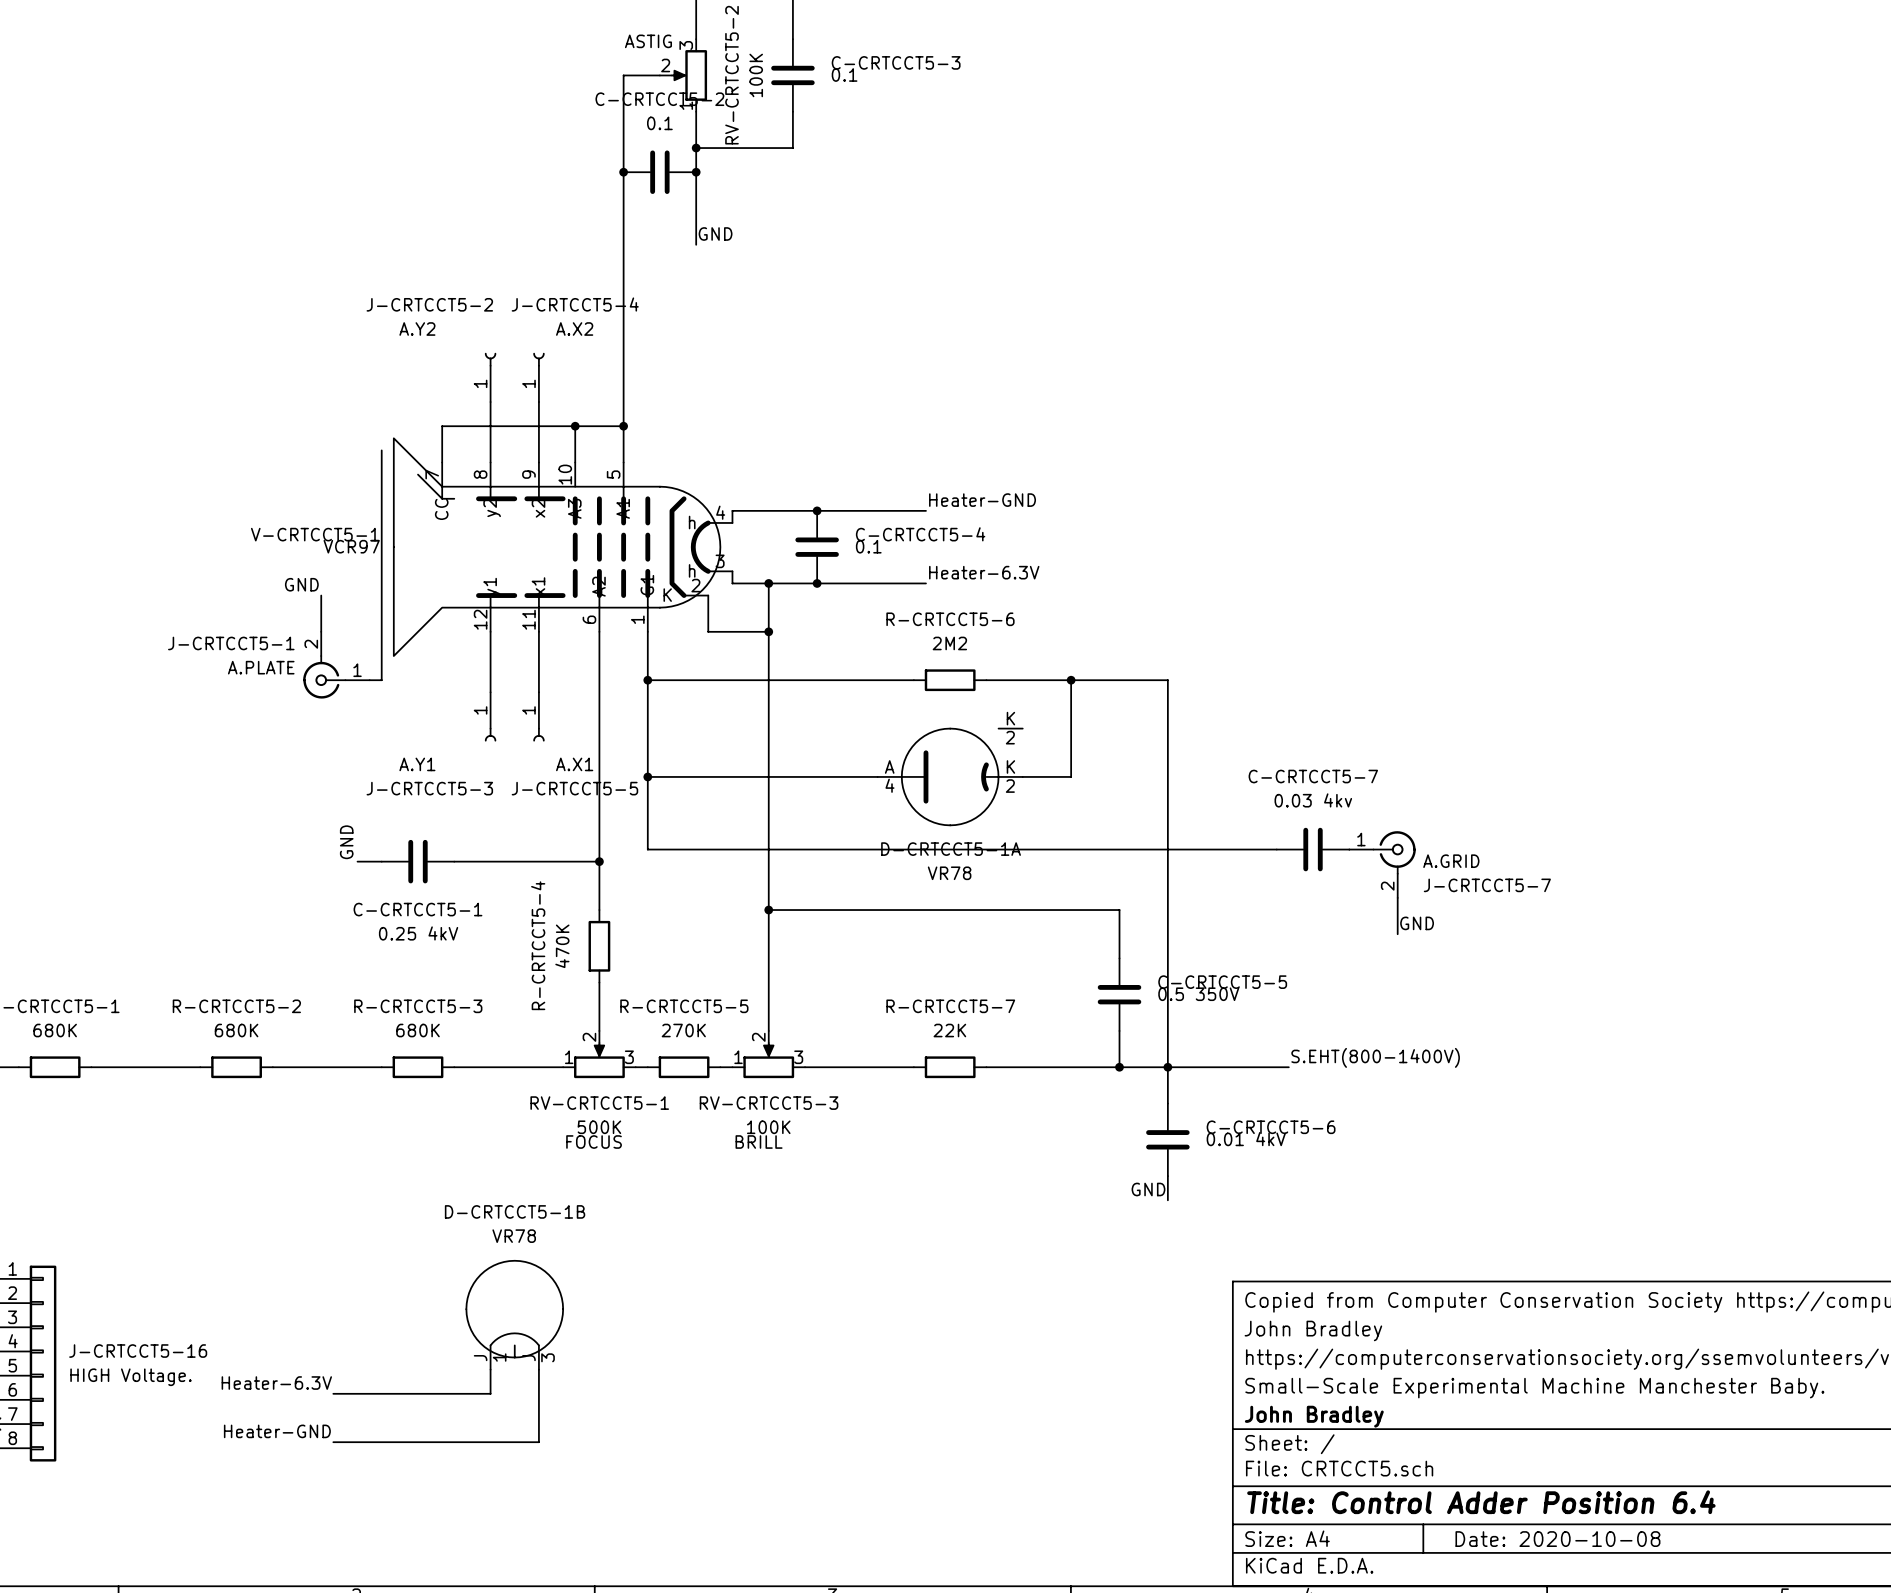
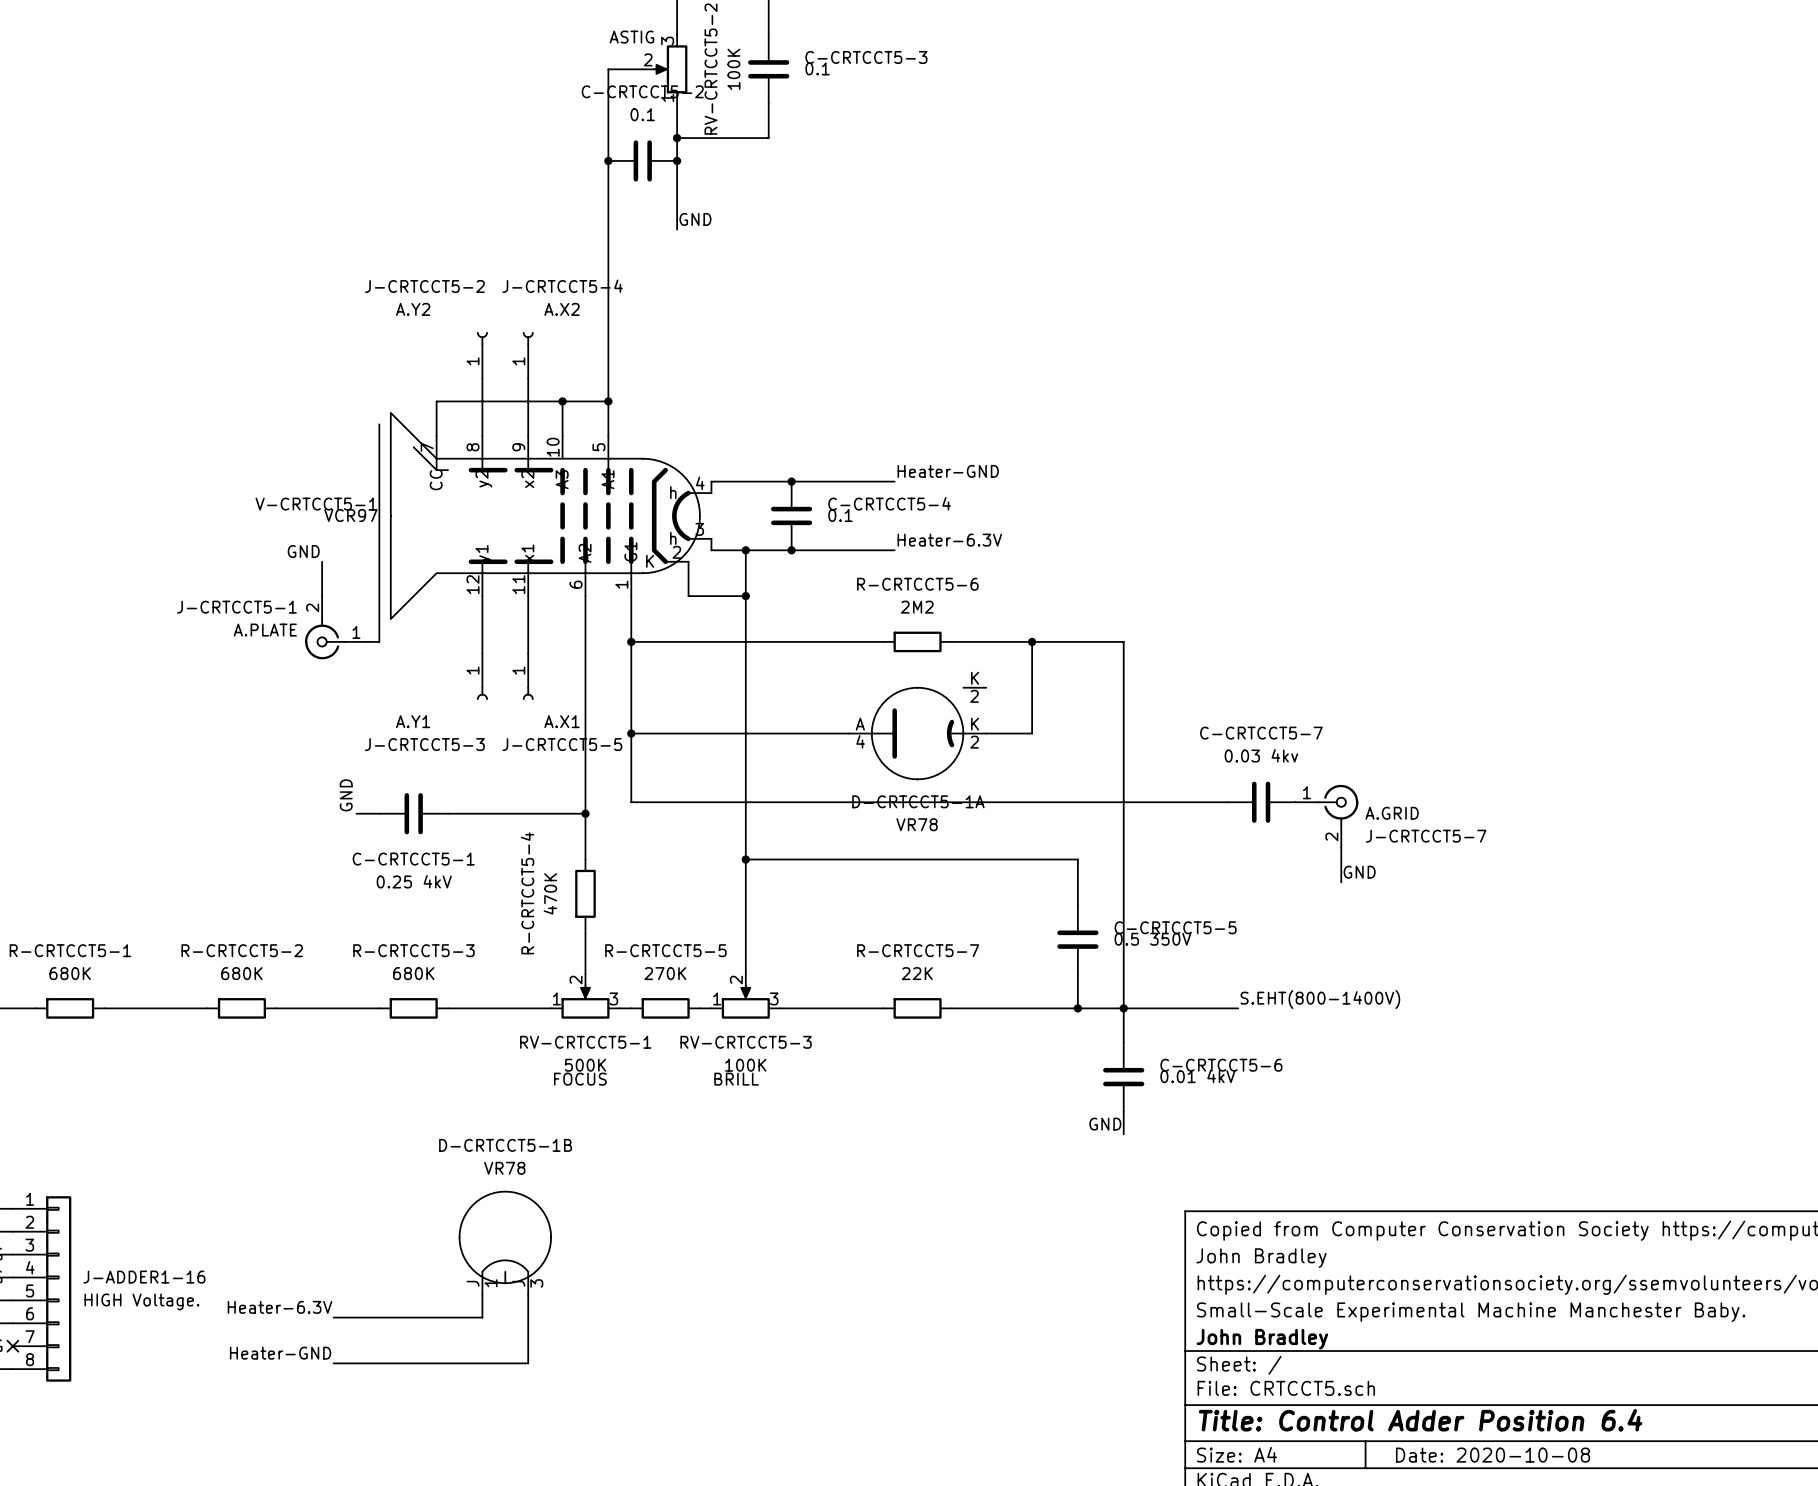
J-CRTCCT5-16 name: J-CRTCCT5-16 (138, 1351) -> J-ADDER1-16 (144, 1277)

